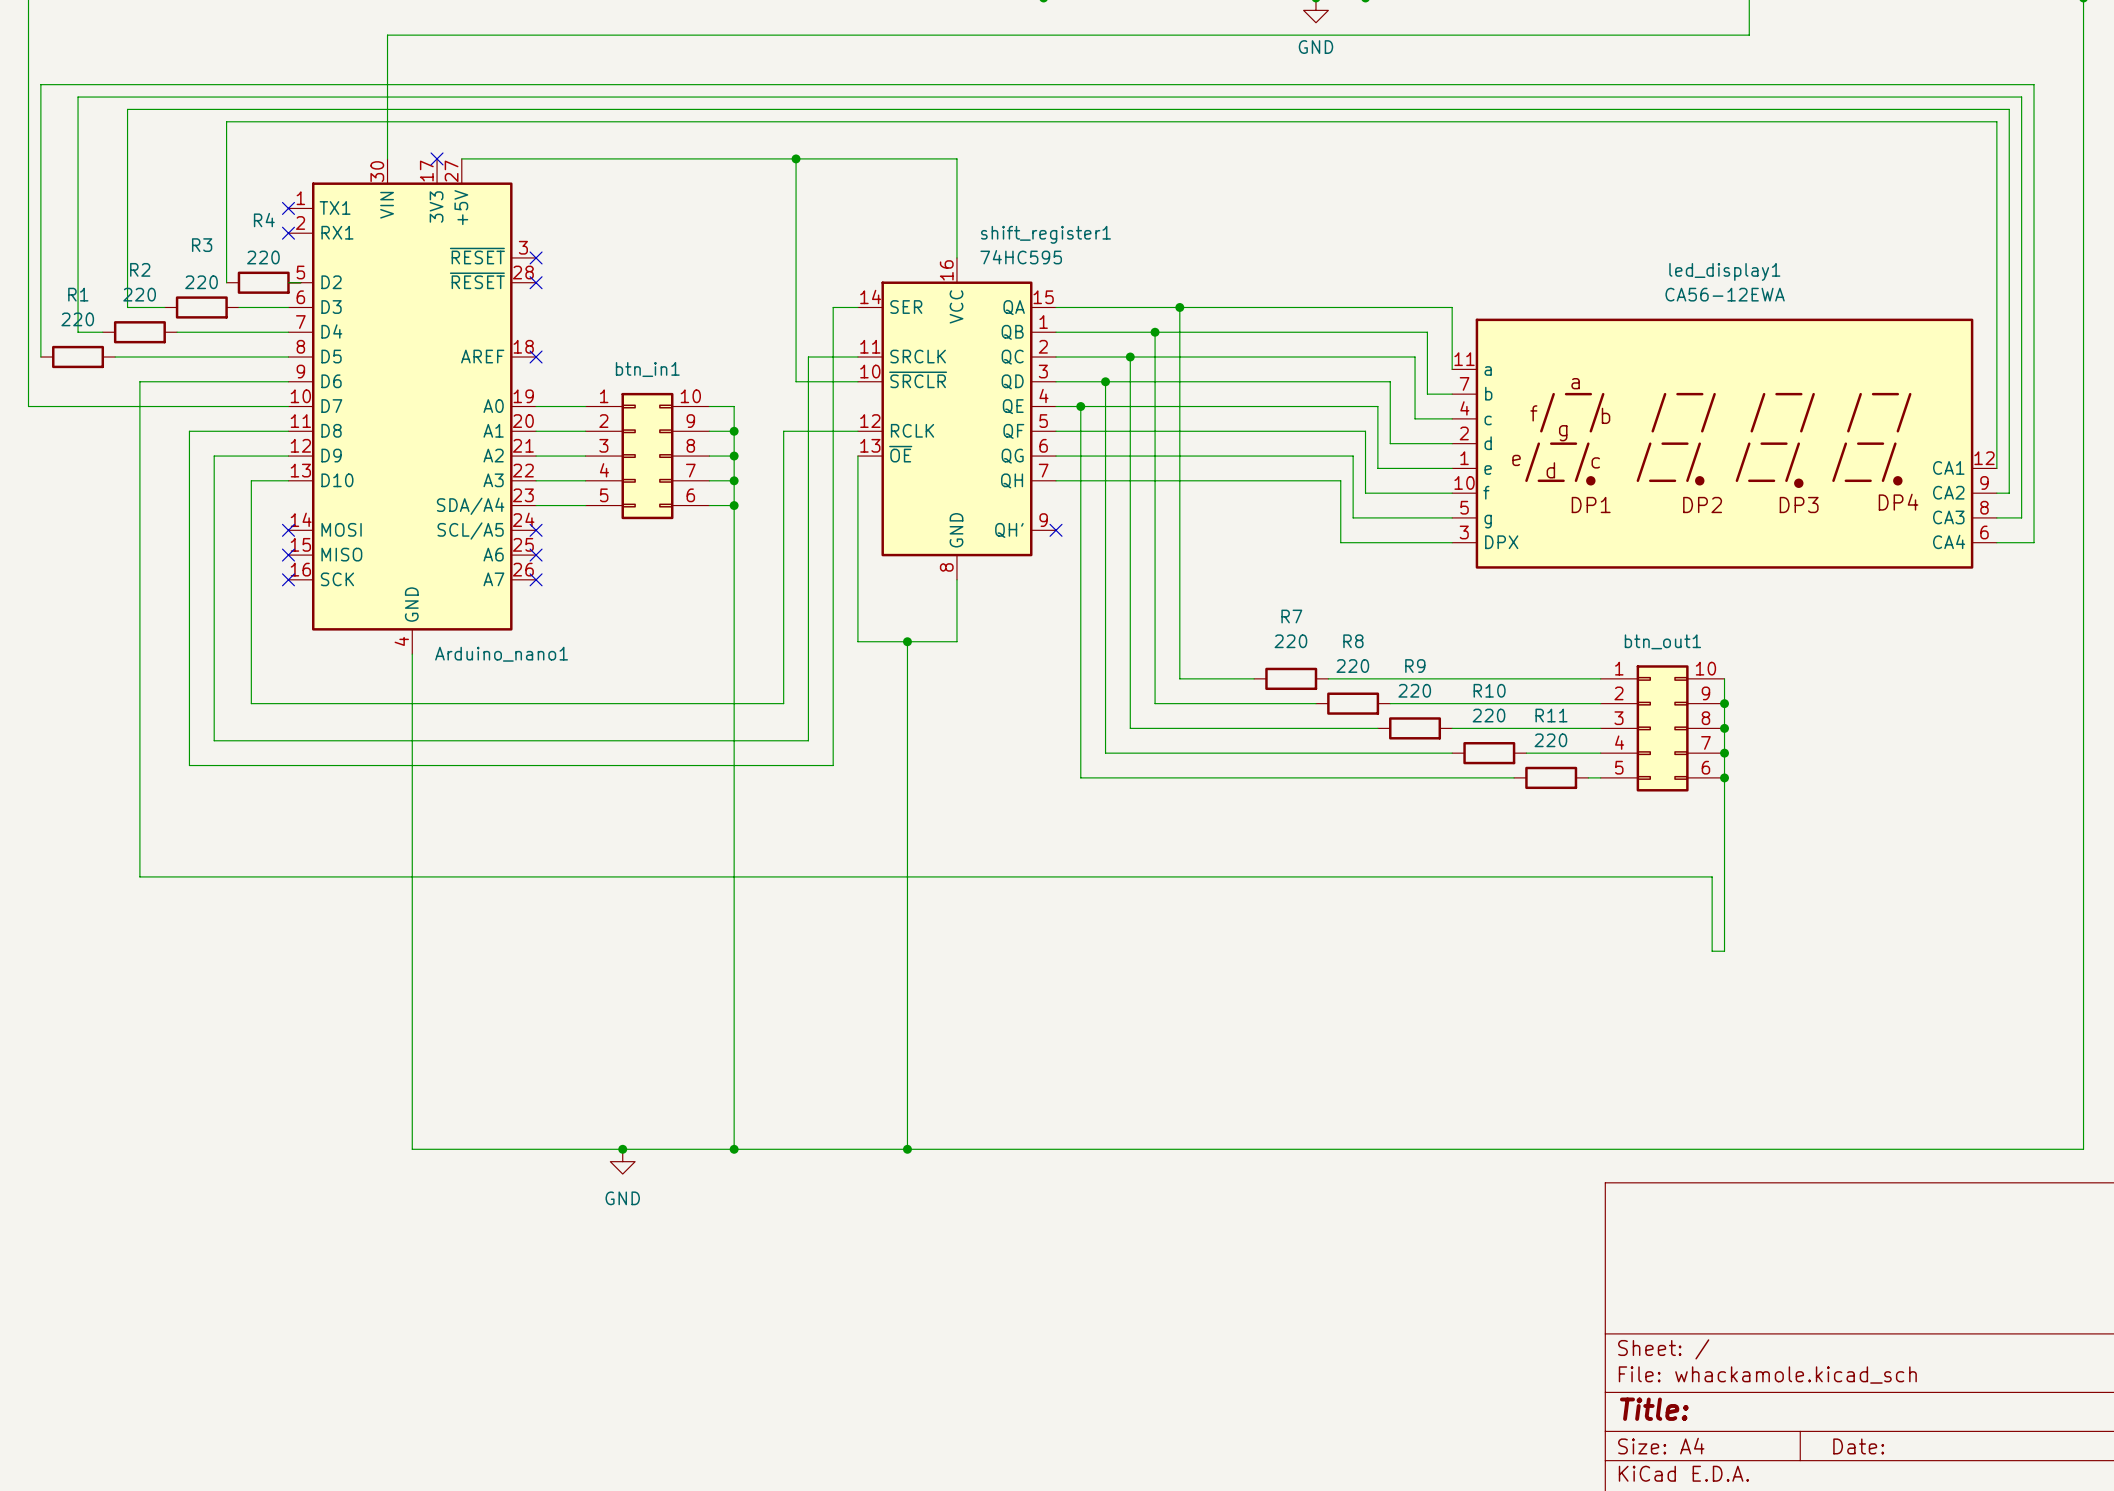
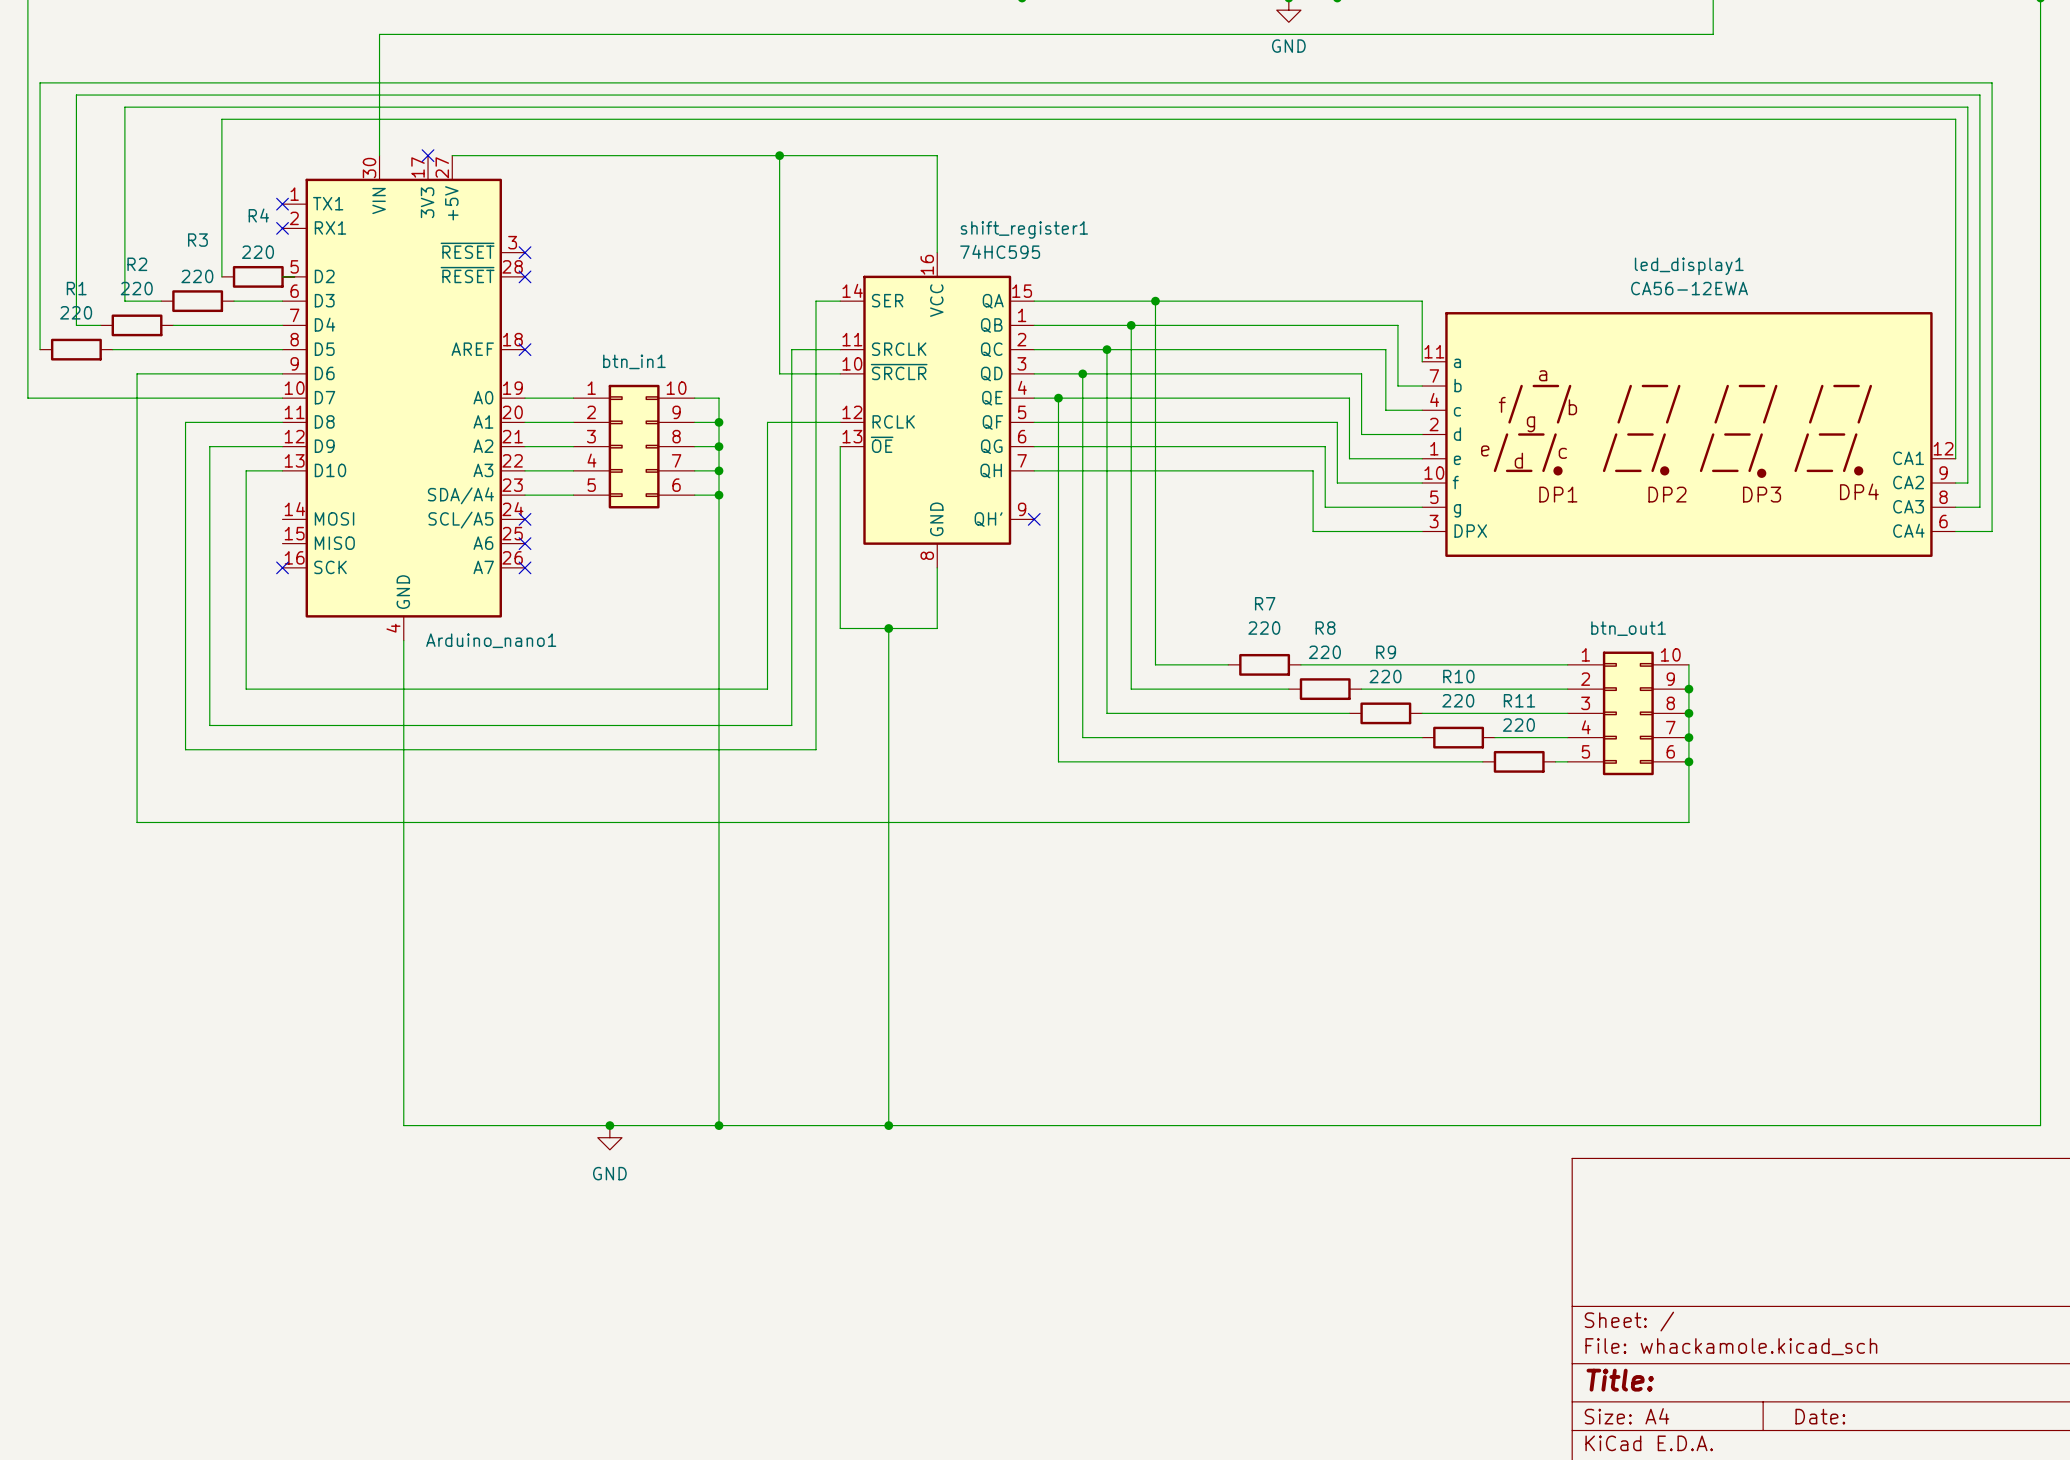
no-connect mark: (288, 530) -> none
no-connect mark: (288, 555) -> none
wire: (139, 839) (139, 876) (1712, 876) (1712, 951) (1724, 951) (1724, 839) -> (137, 822) (1688, 822)

